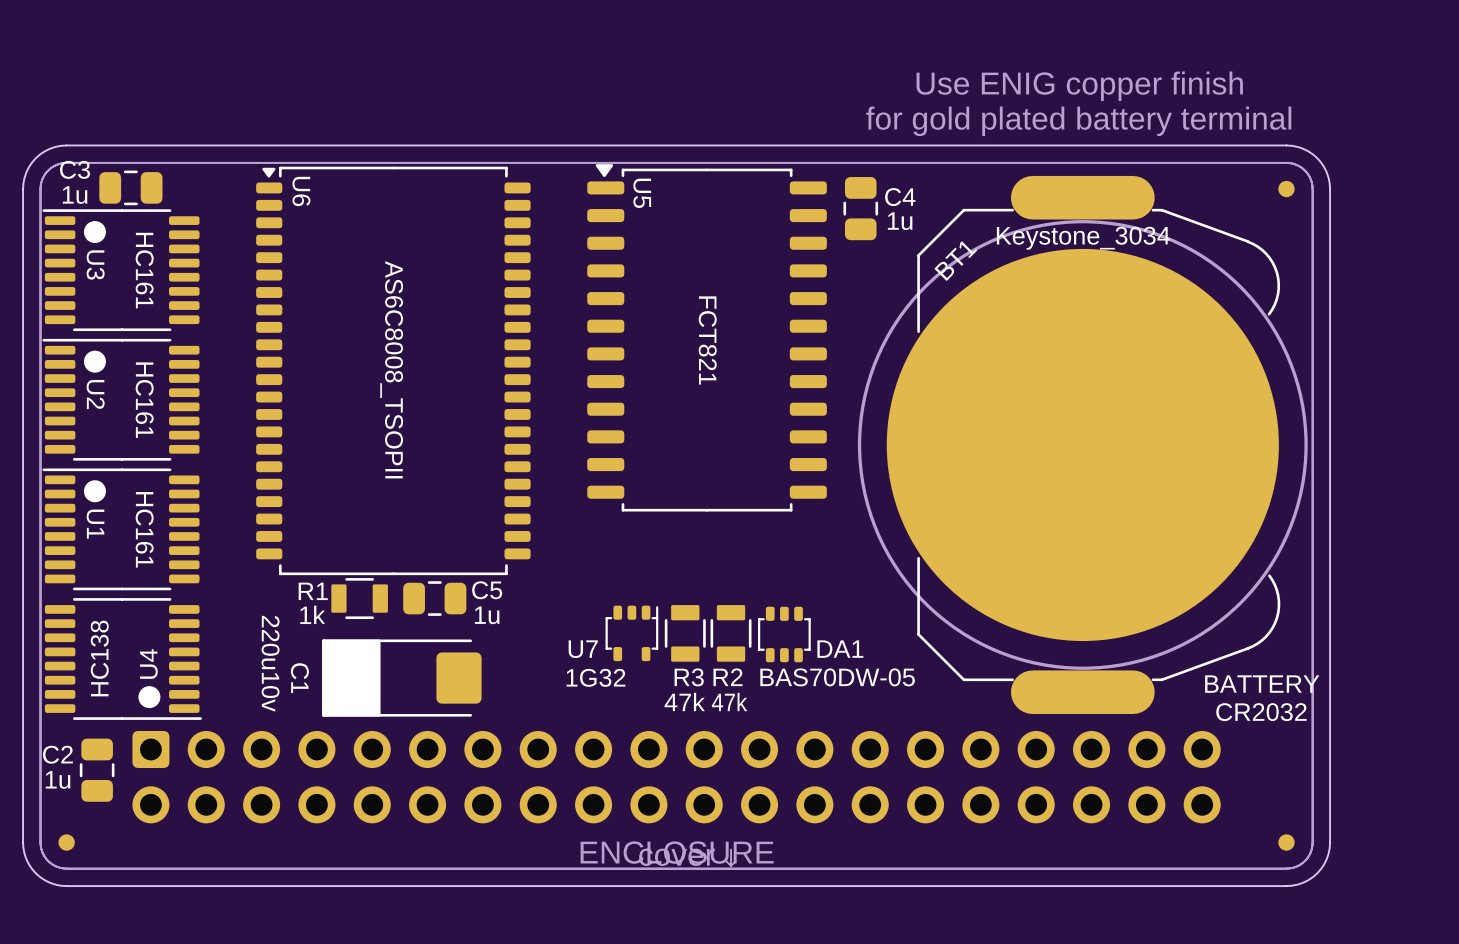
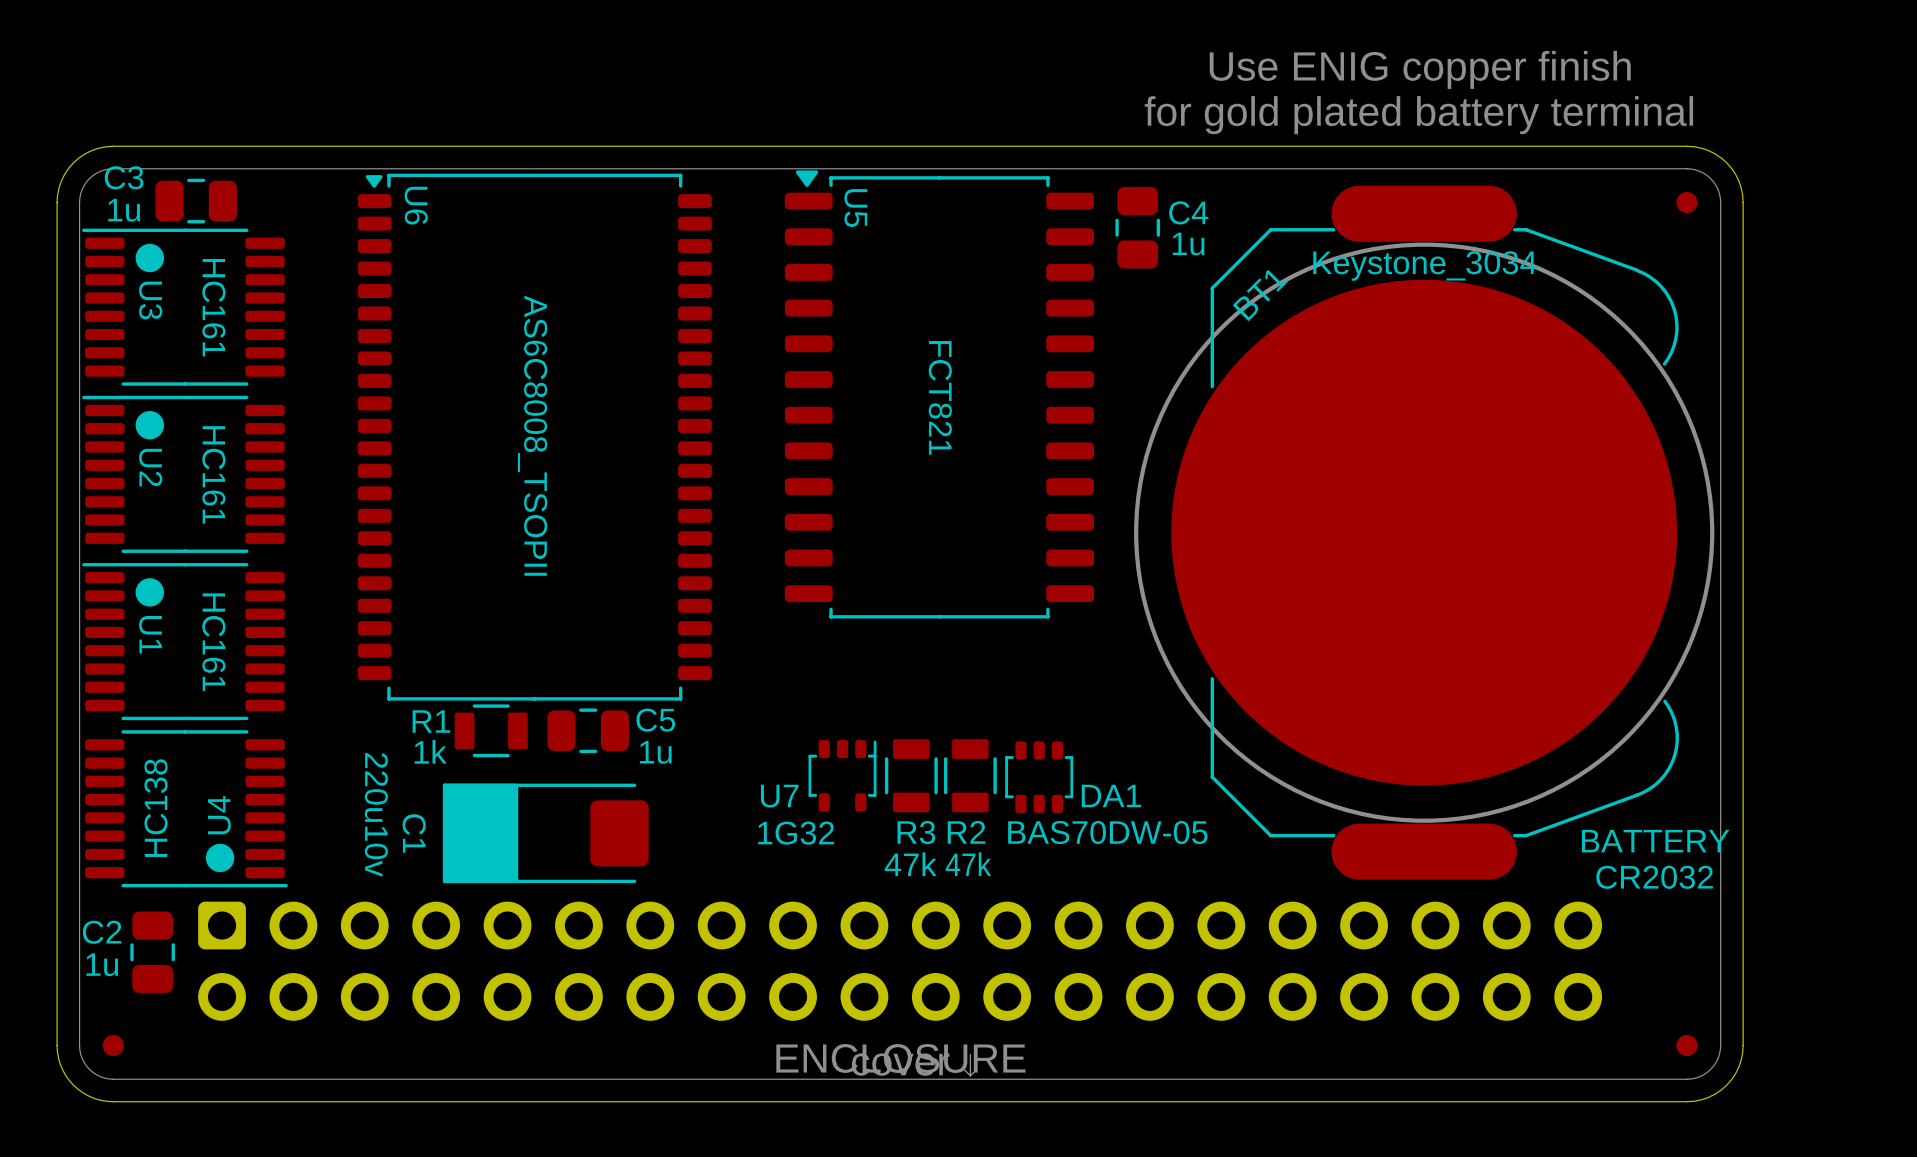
line: (66, 162) (1286, 162) (1299, 166) (1309, 175) (1312, 189) (1312, 842) (1309, 855) (1299, 865) (1286, 868) (66, 868) (53, 865) (44, 855) (40, 842) (40, 189) (42, 179) (48, 170) (56, 164) (66, 162) -> none

